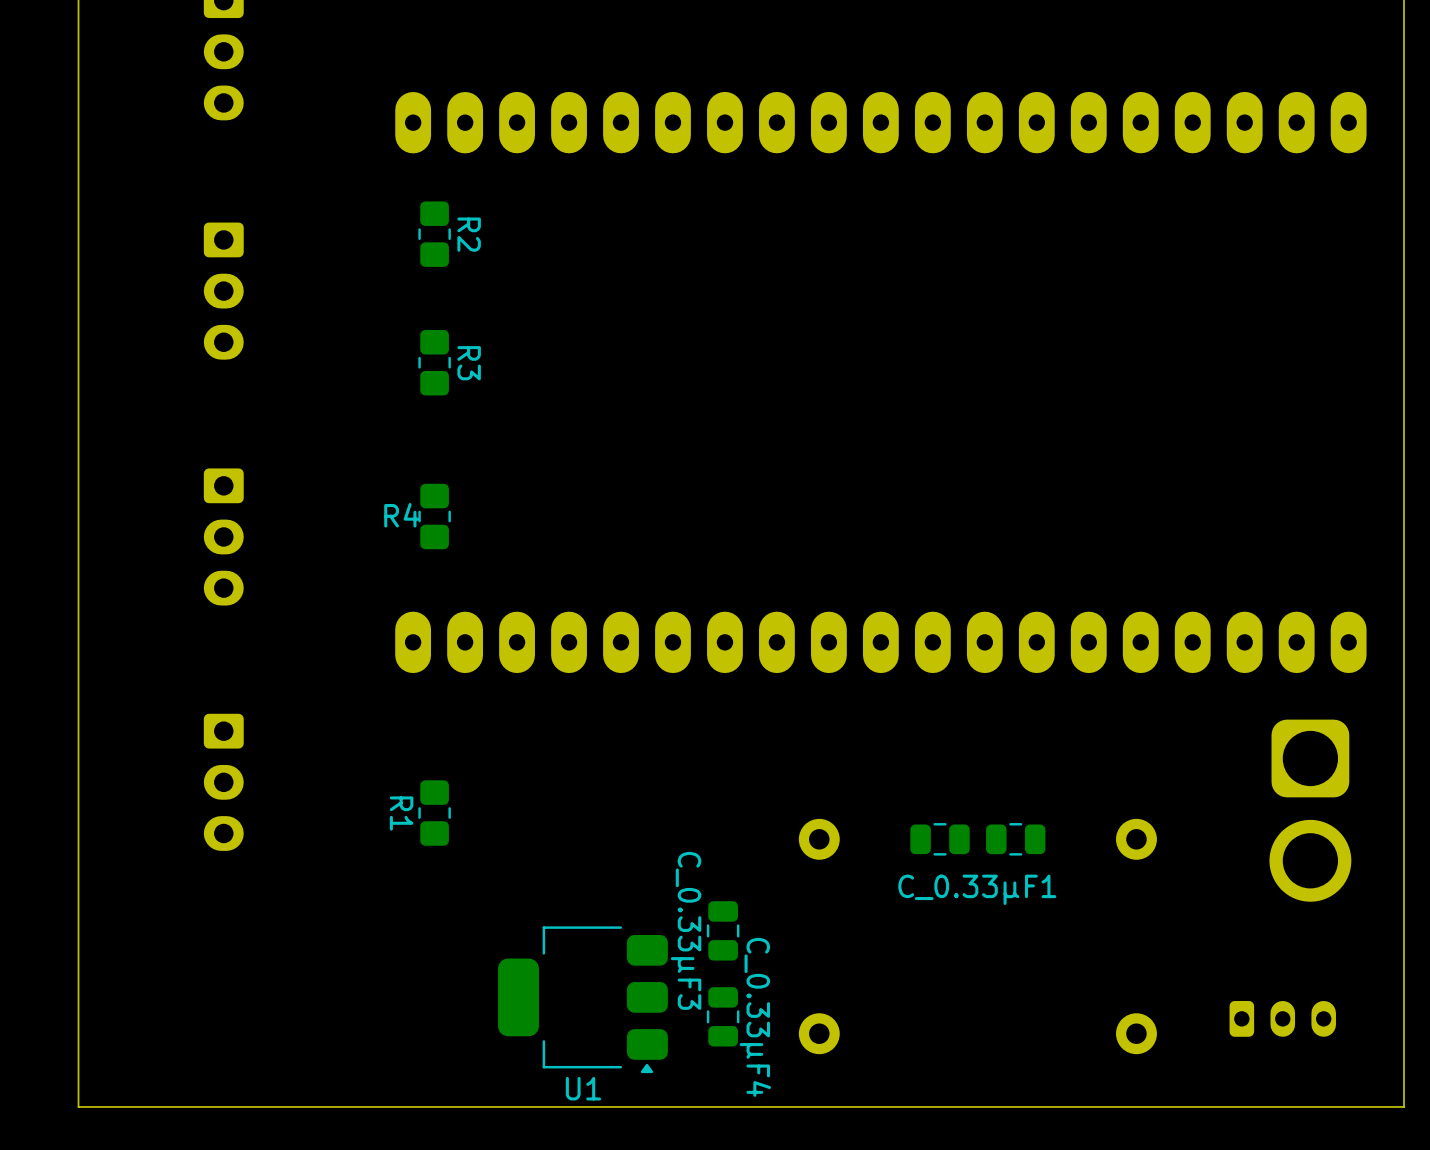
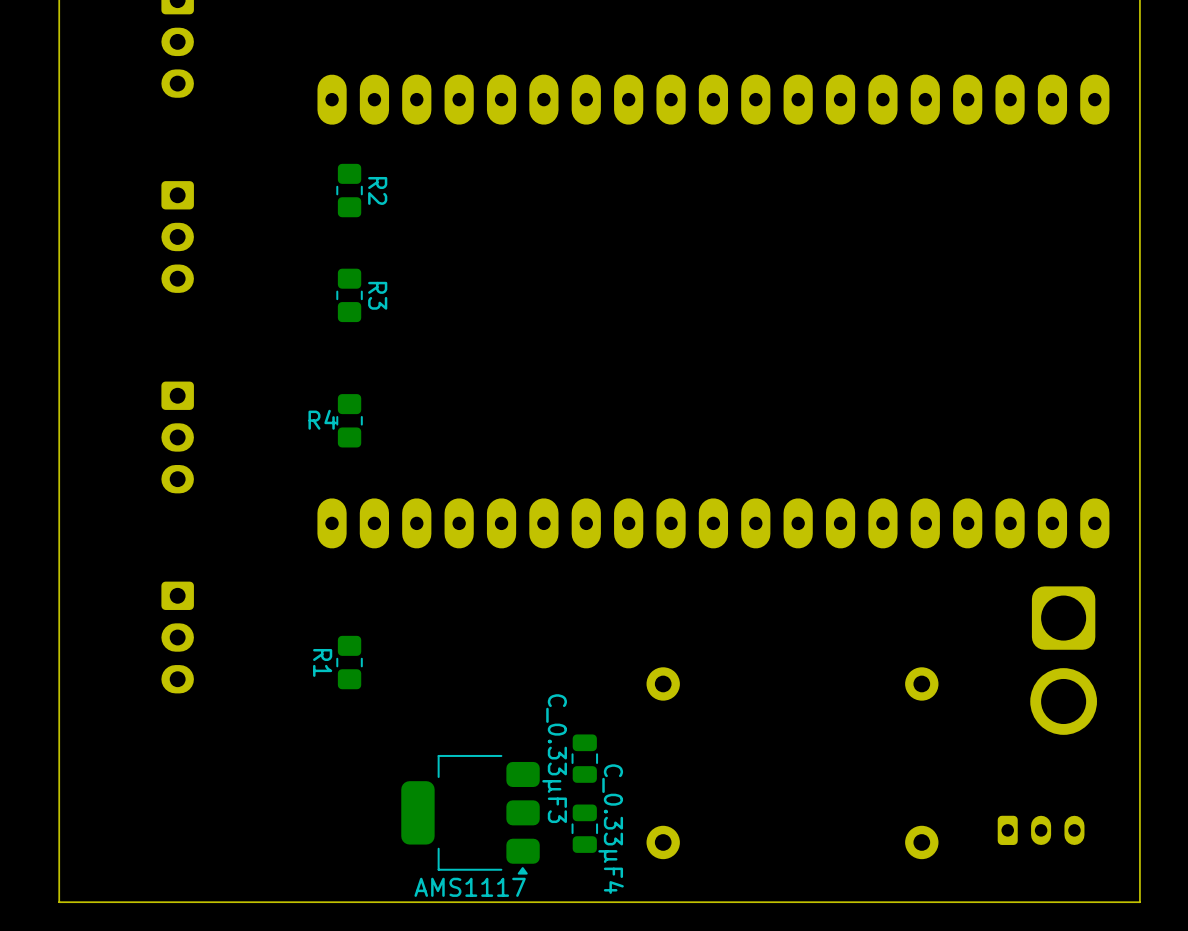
C_0.33µF1: (940, 839) -> none
part: (1015, 839) -> none
U1 name: U1 (583, 1088) -> AMS1117 (470, 887)

